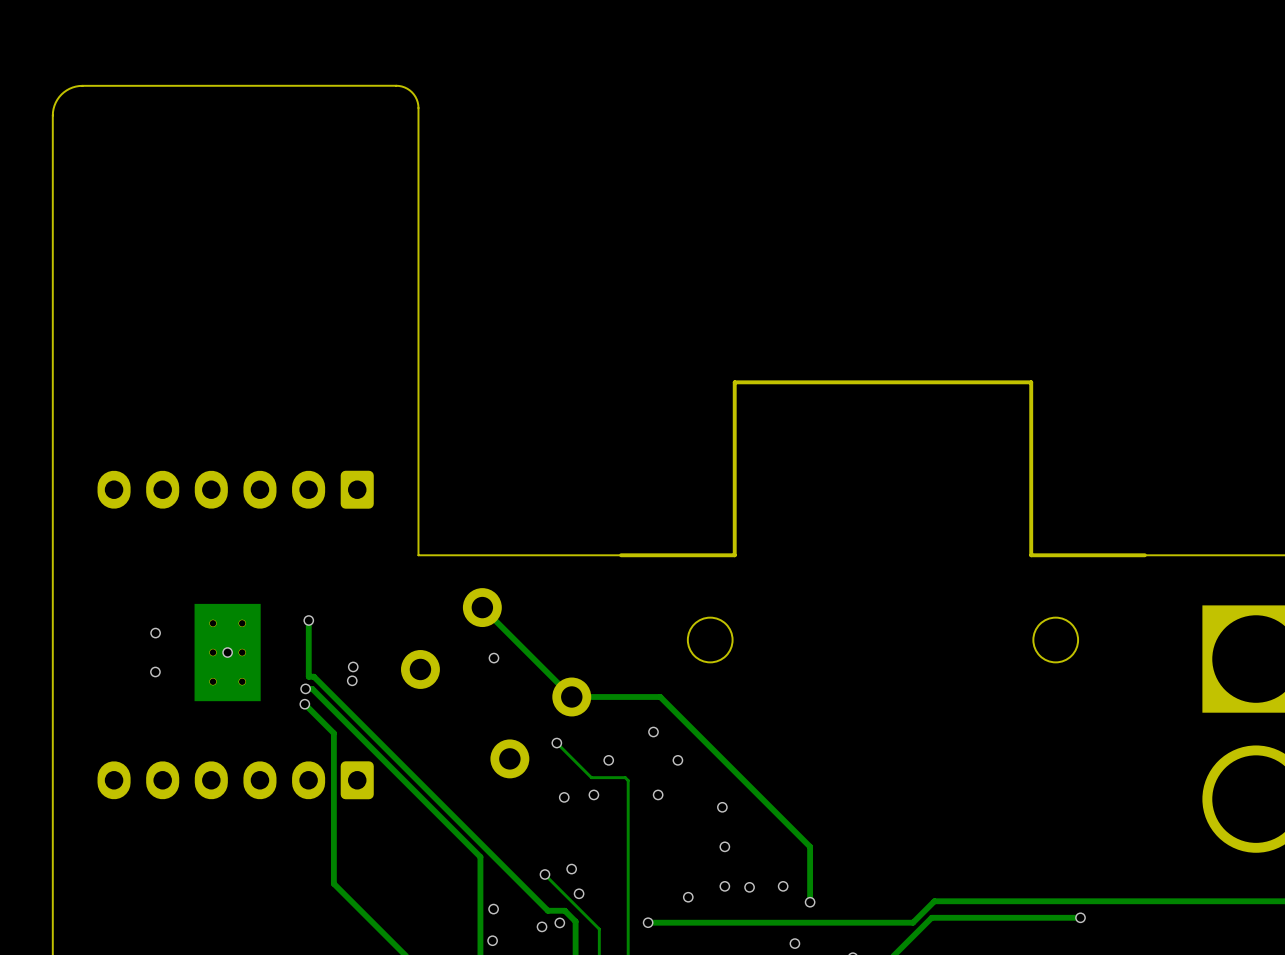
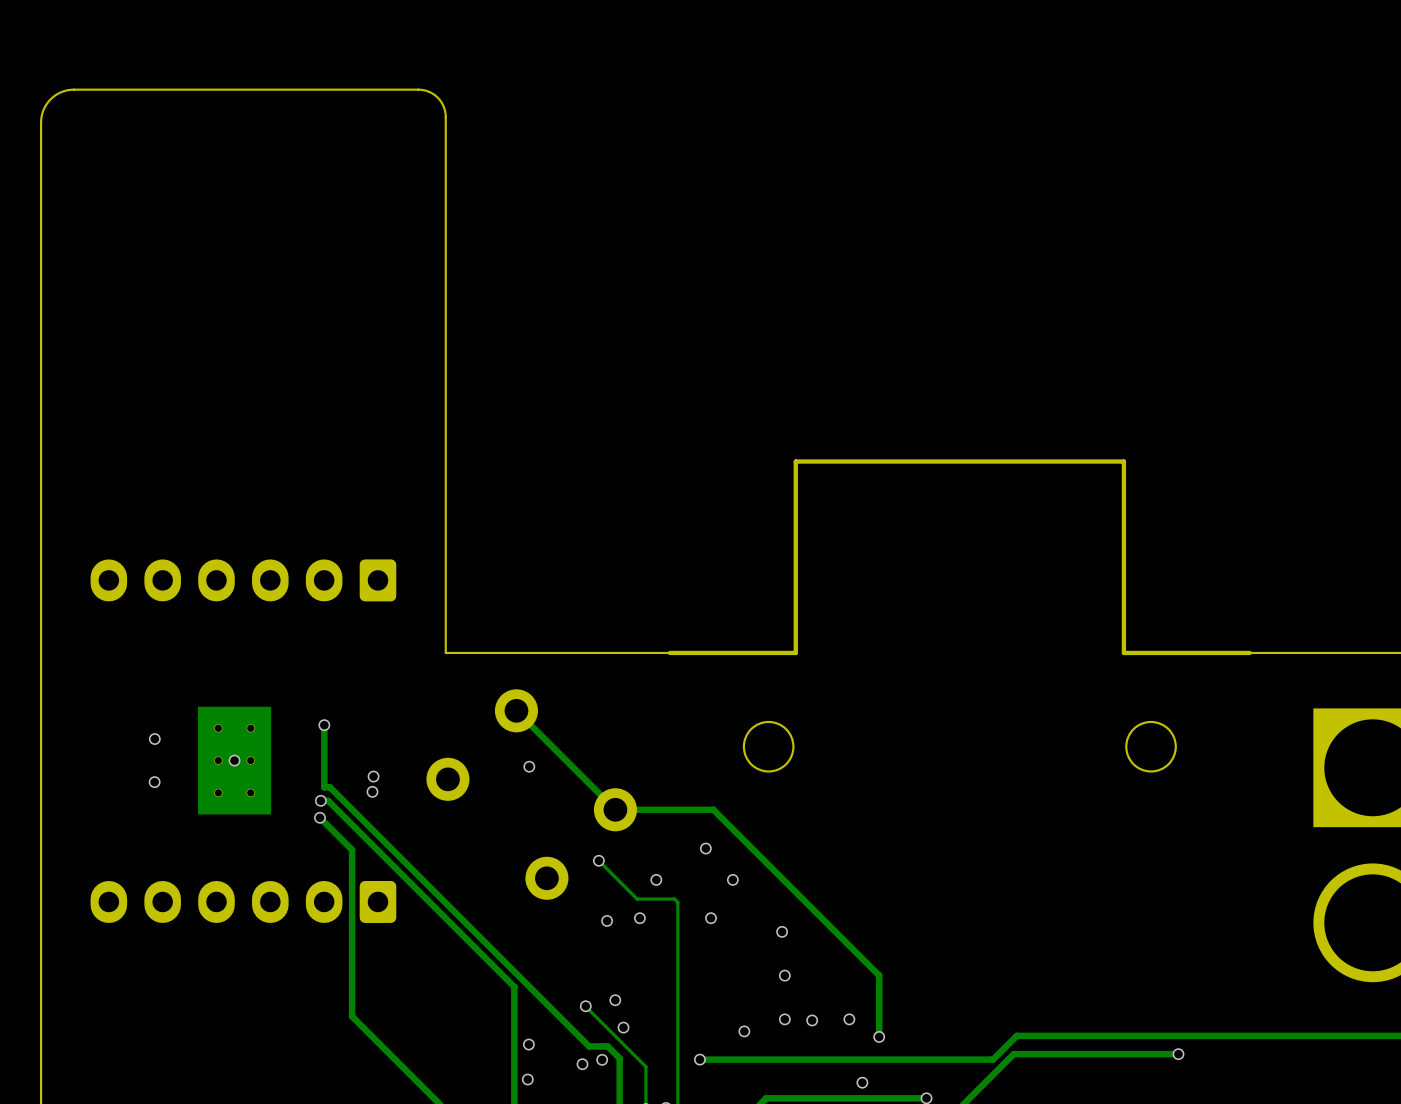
board edge: (418, 108) (416, 99) (411, 92) (399, 85) (82, 85) (72, 87) (61, 94) (55, 102) (52, 115) -> (445, 157) (444, 107) (435, 95) (424, 90) (73, 89) (56, 94) (44, 108) (41, 122) (41, 166)

